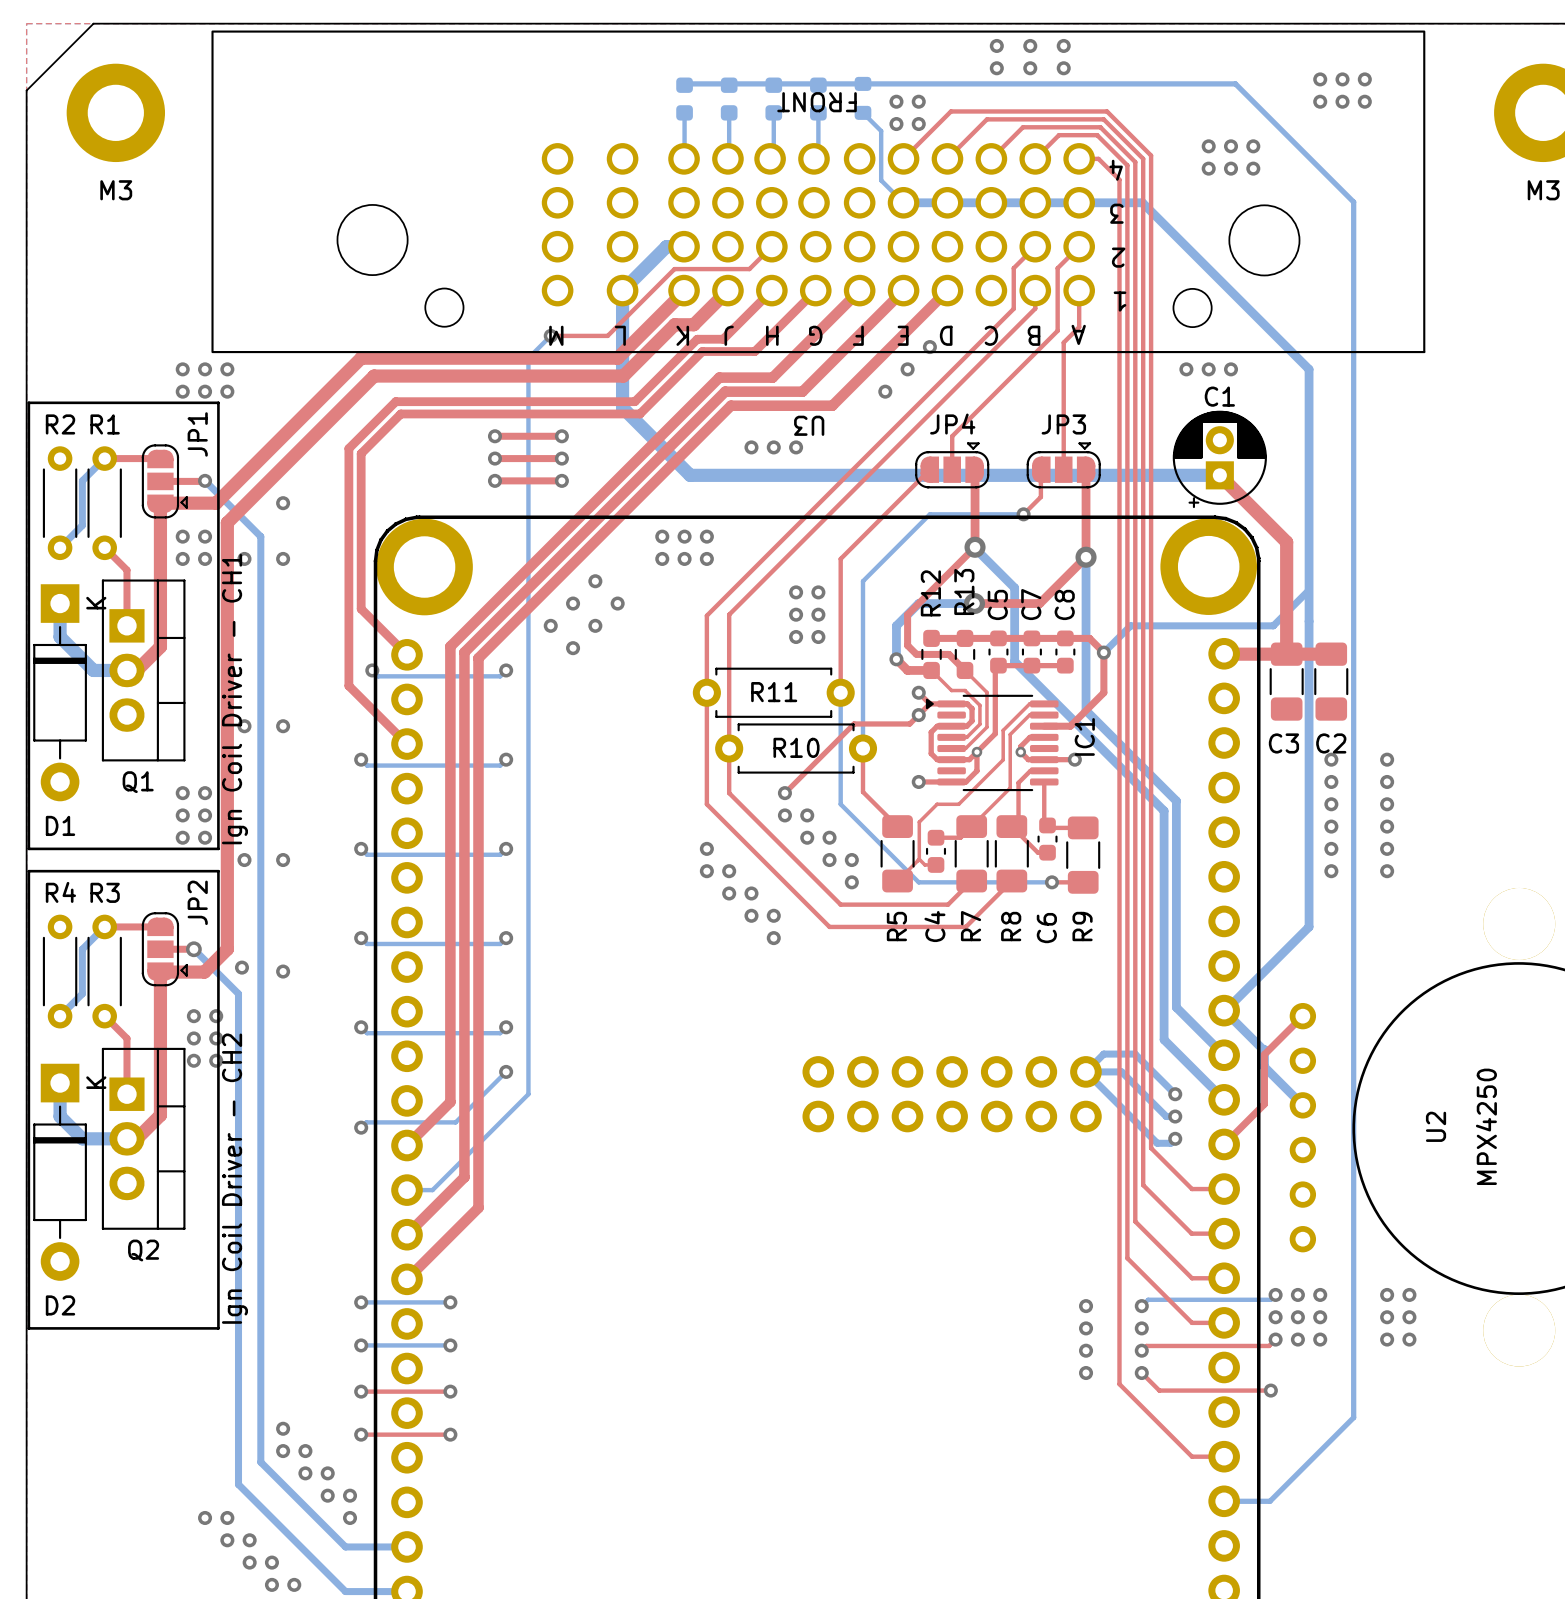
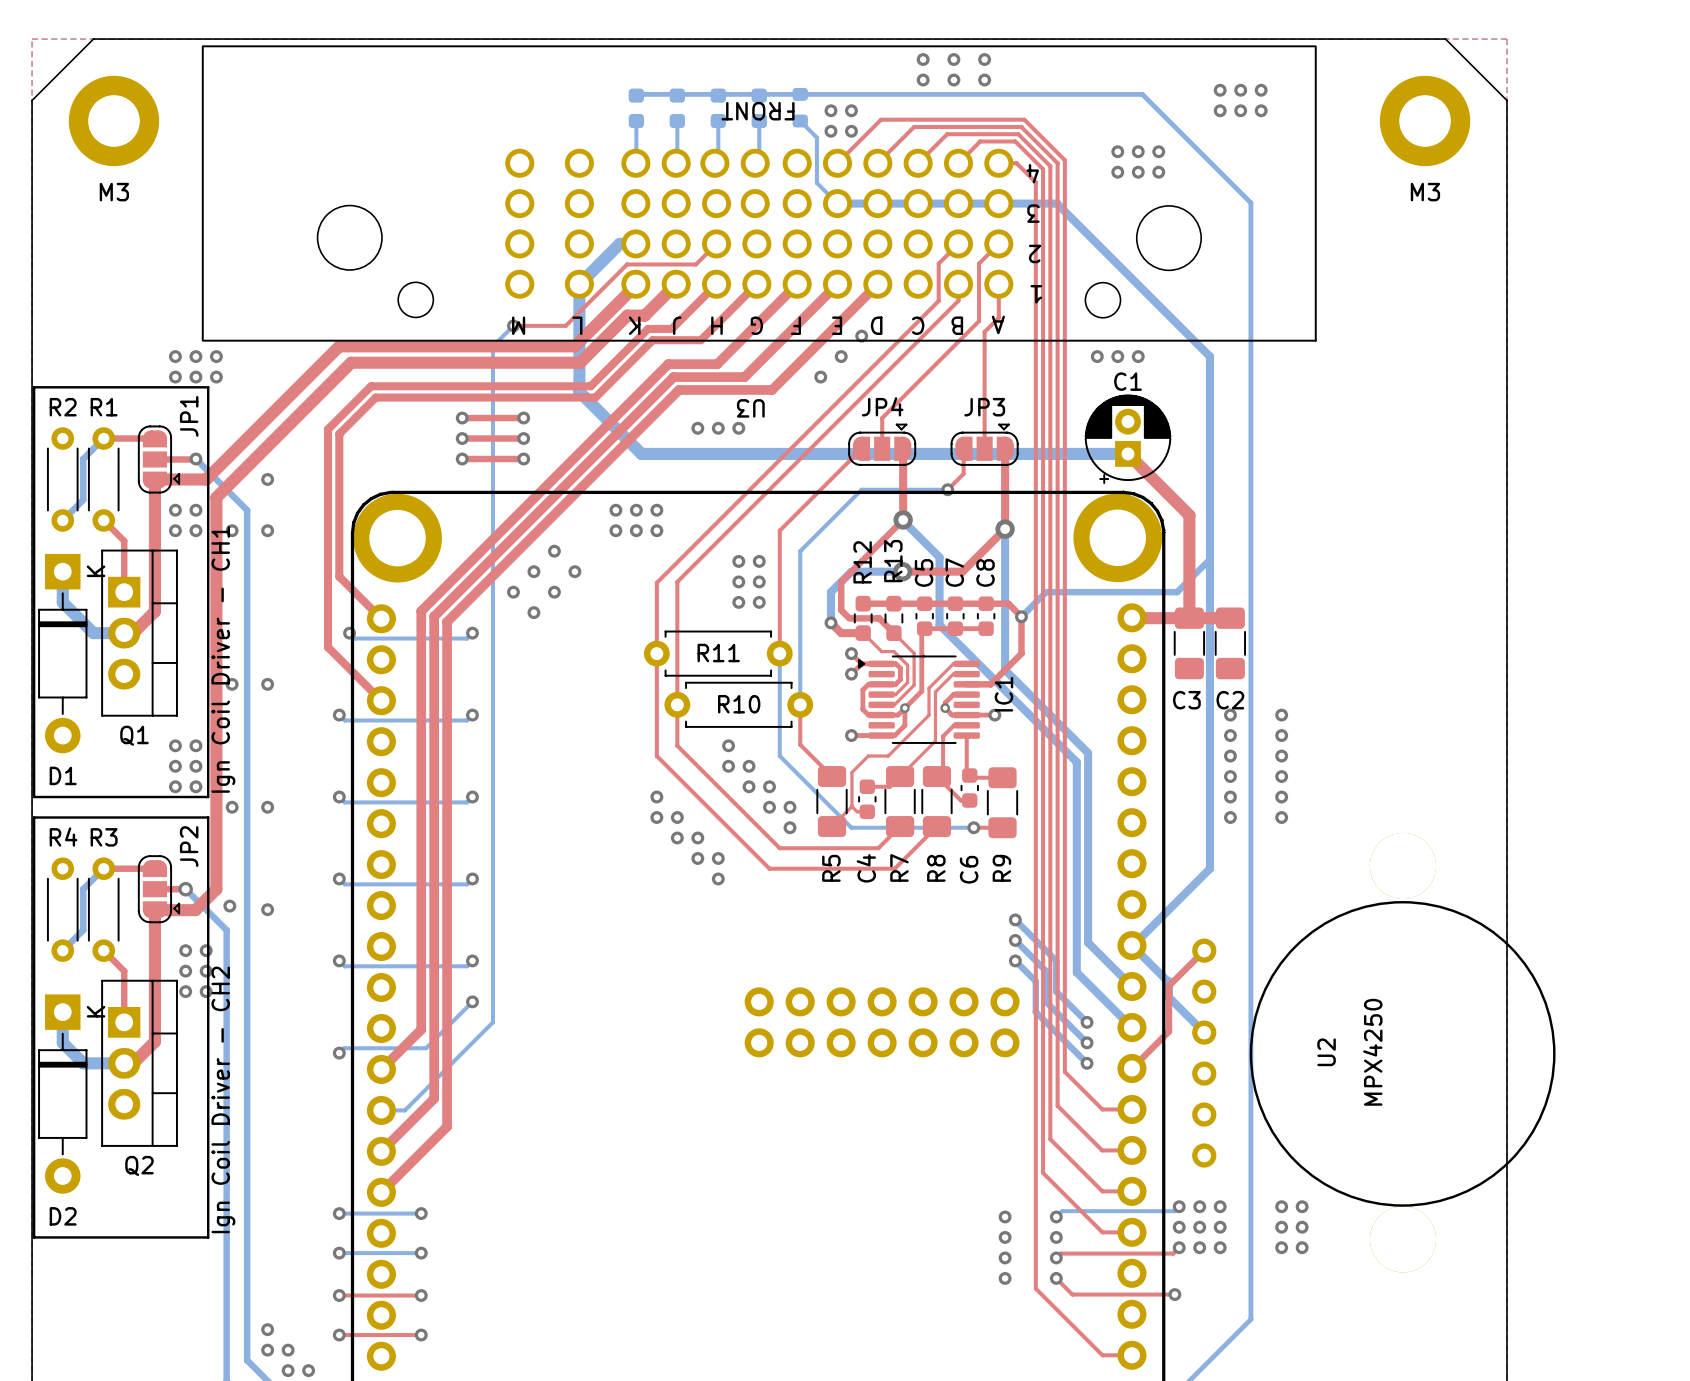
top track: (918, 715) (909, 723) (854, 723) (784, 793) -> none
via: none -> (1015, 919)
via: none -> (1015, 940)
via: none -> (1015, 960)
bottom track: (1141, 1060) (1135, 1054) (1103, 1054) (1085, 1071) -> (1056, 991) (1056, 960) (1015, 919)
bottom track: (1085, 1071) (1157, 1143) (1170, 1143) (1175, 1138) -> (1015, 960) (1035, 981) (1035, 1012) (1087, 1063)
bottom track: (1085, 1071) (1121, 1071) (1166, 1116) (1175, 1116) -> (1015, 940) (1046, 971) (1046, 1001) (1087, 1042)

